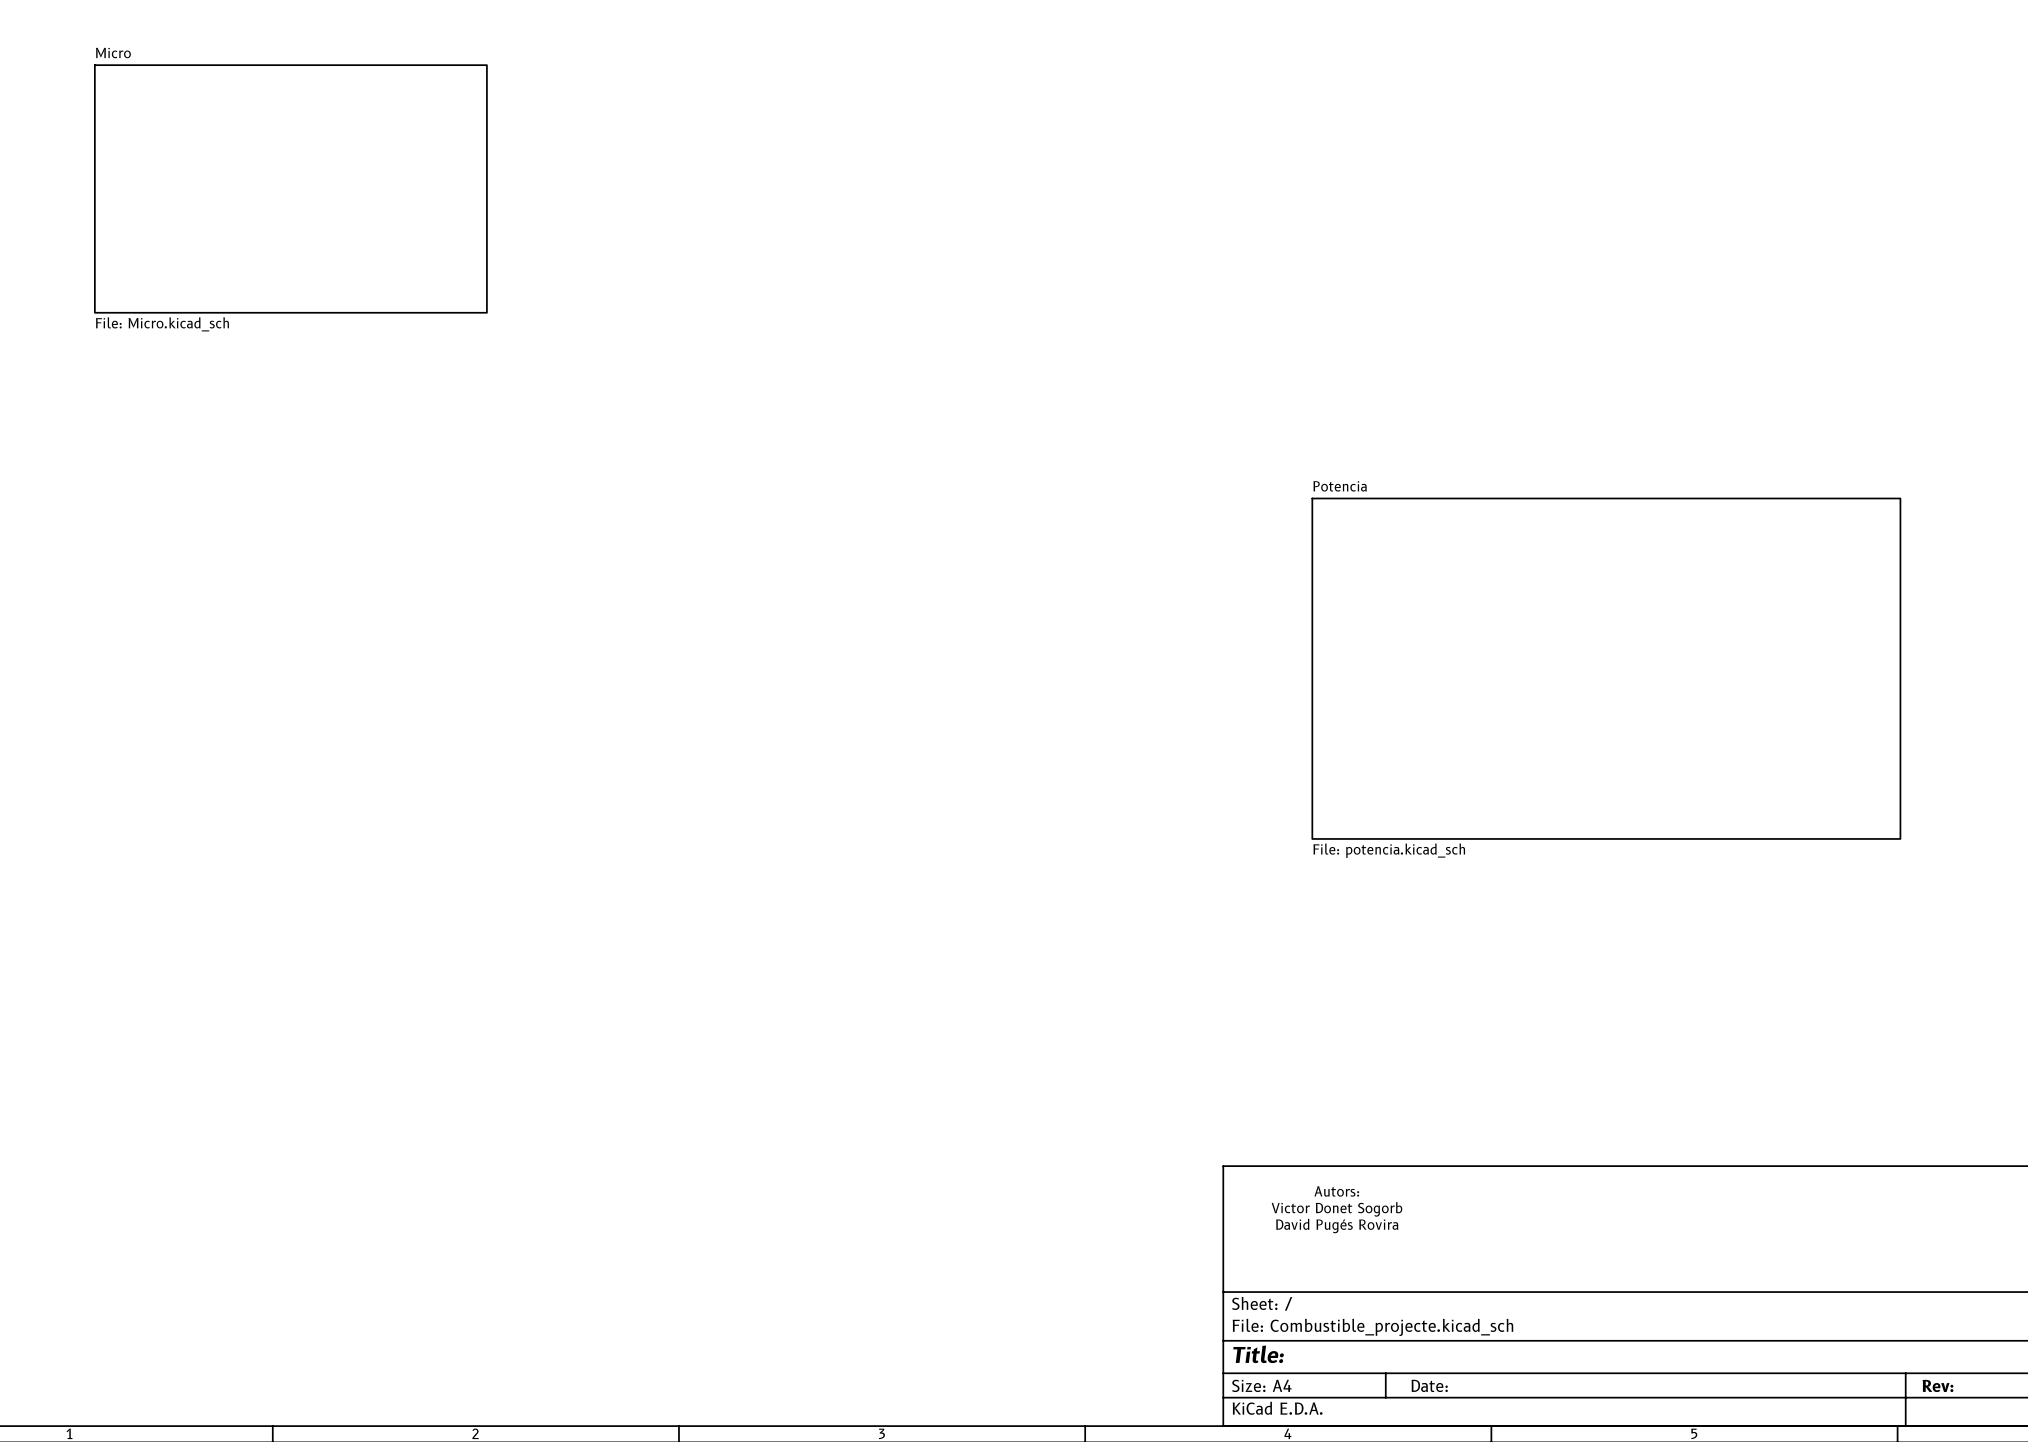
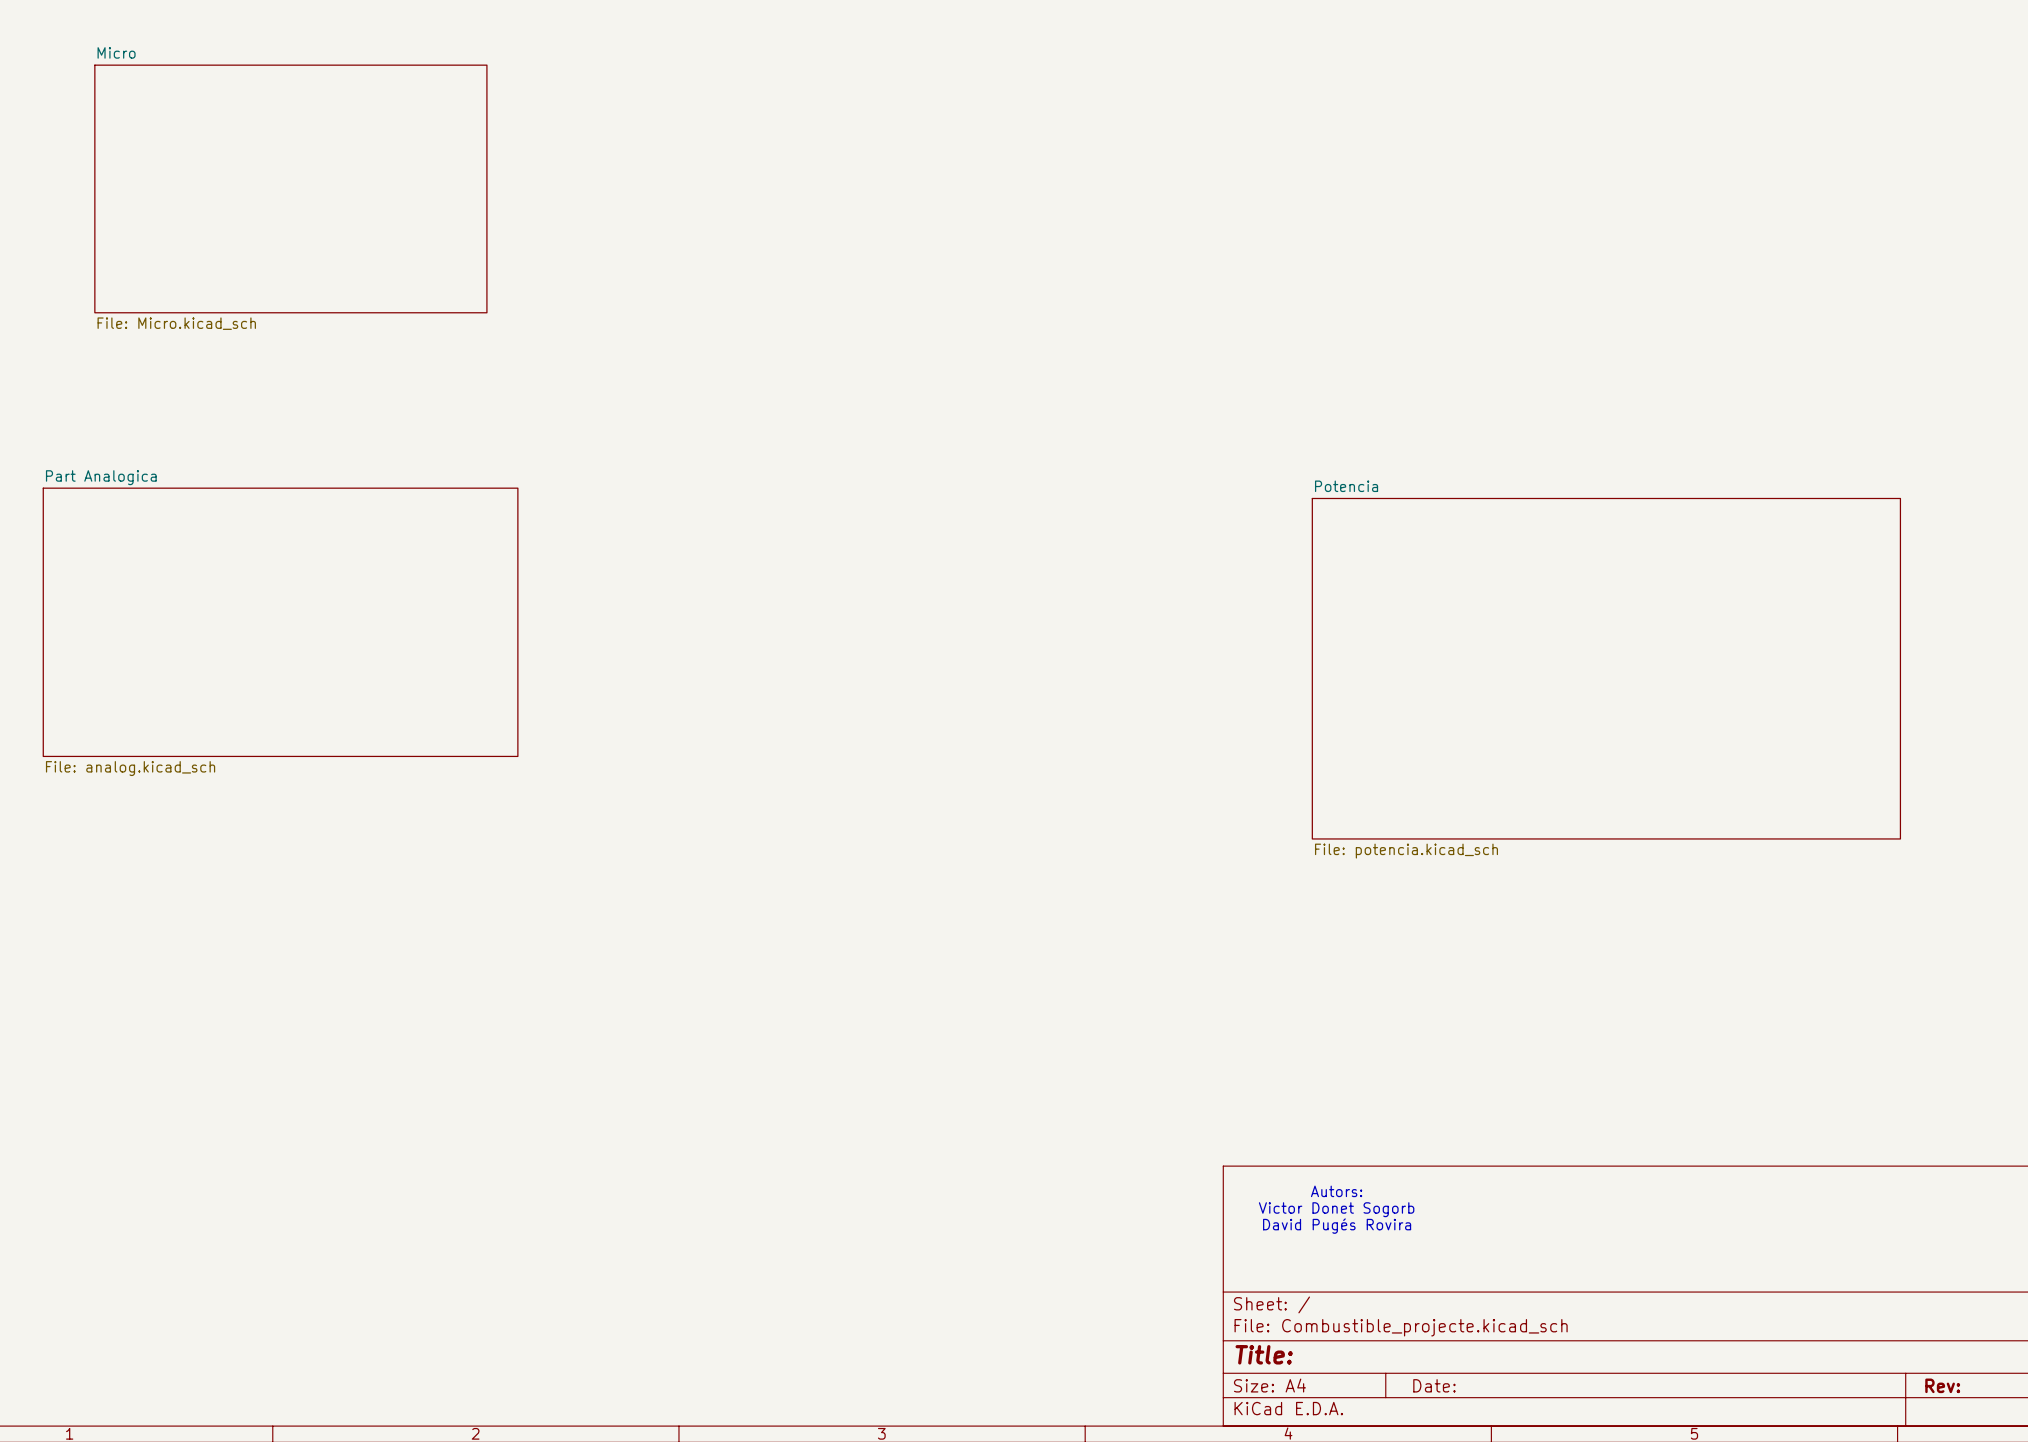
sheet Part Analogica: none -> File: analog.kicad_sch (280, 622)

